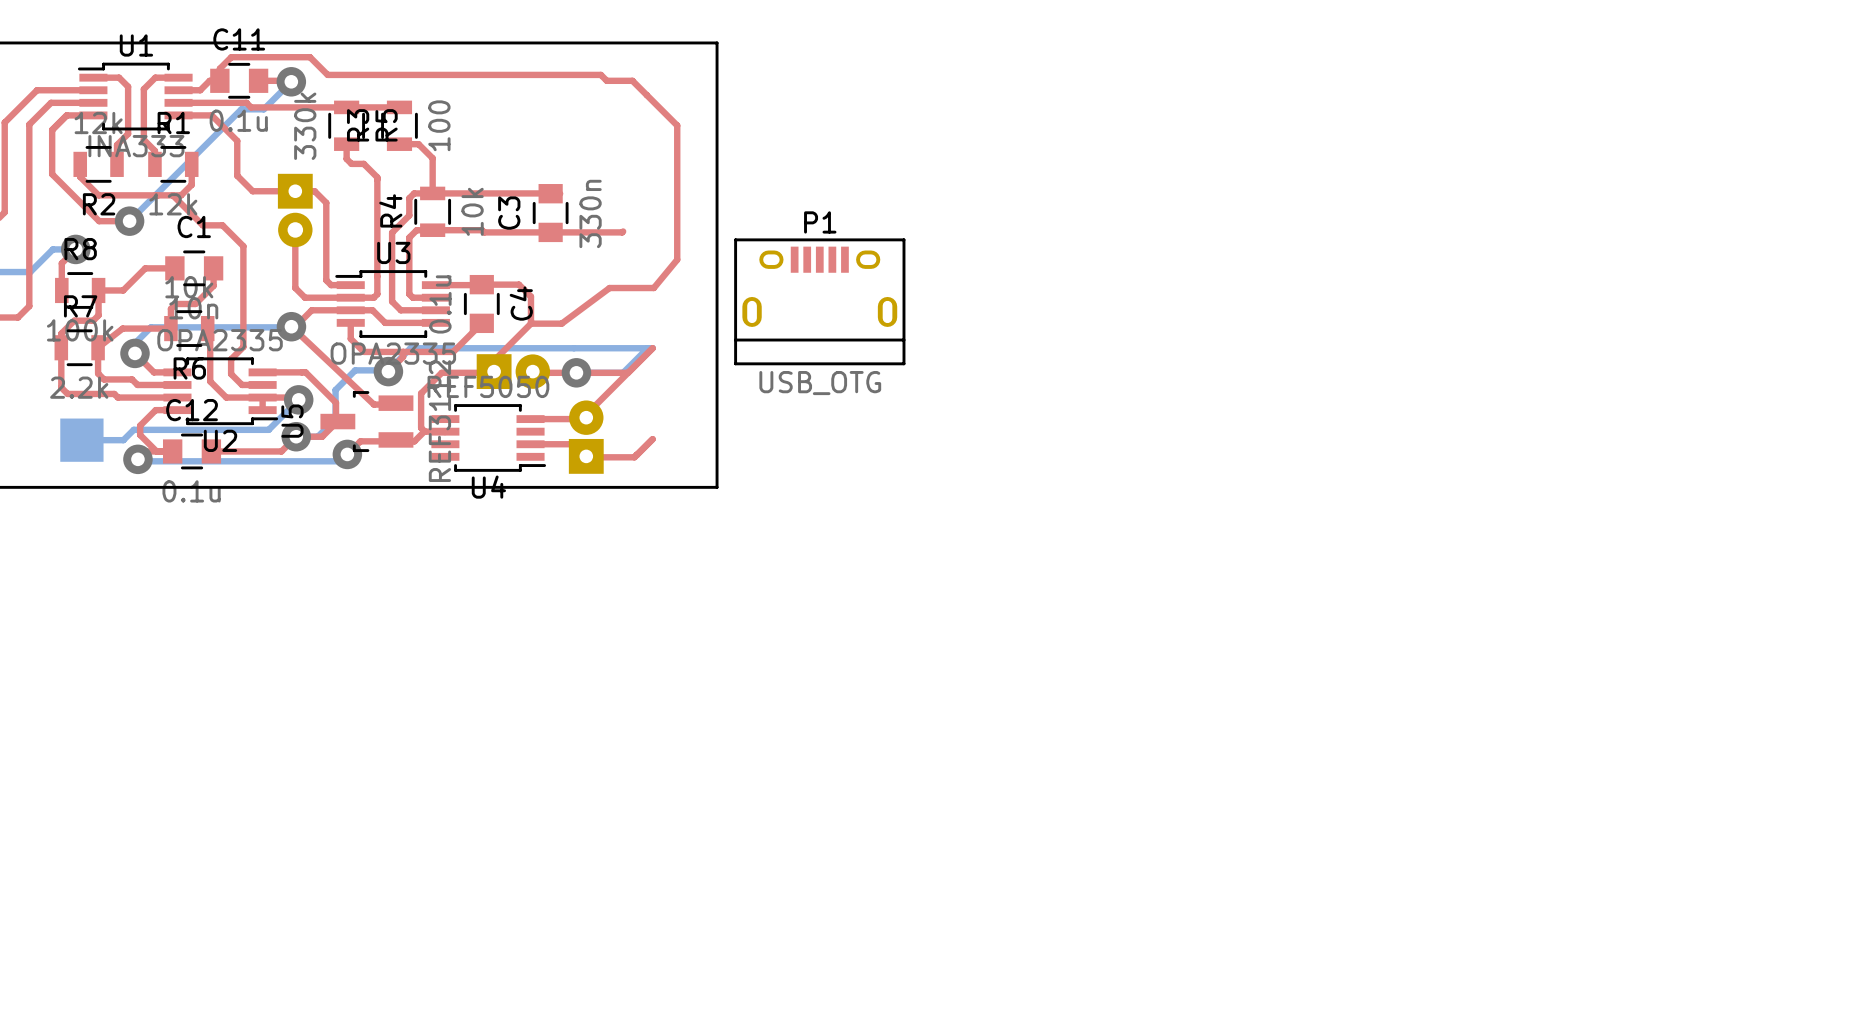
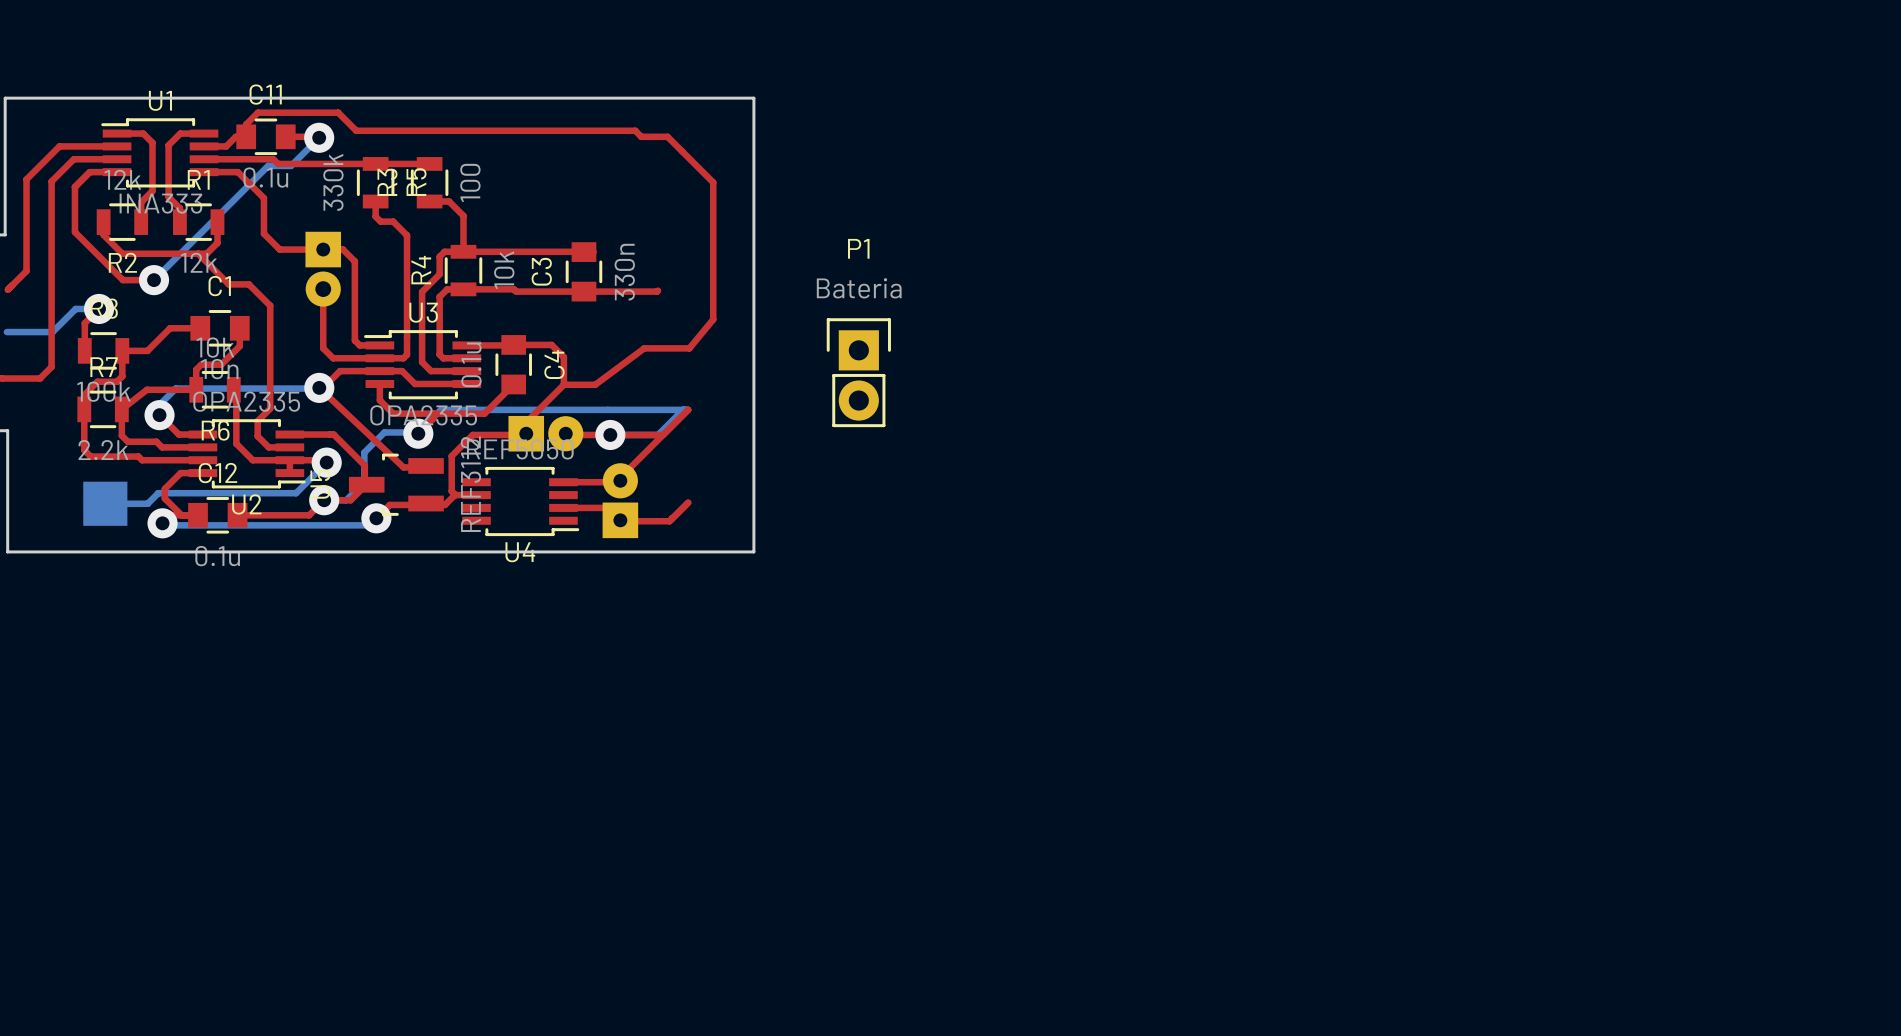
P1 name position: P1 (820, 222) -> P1 (858, 248)
P1 footprint: [734, 238, 906, 366] -> [826, 318, 891, 428]
P1 value: USB_OTG (820, 383) -> Bateria (859, 288)

